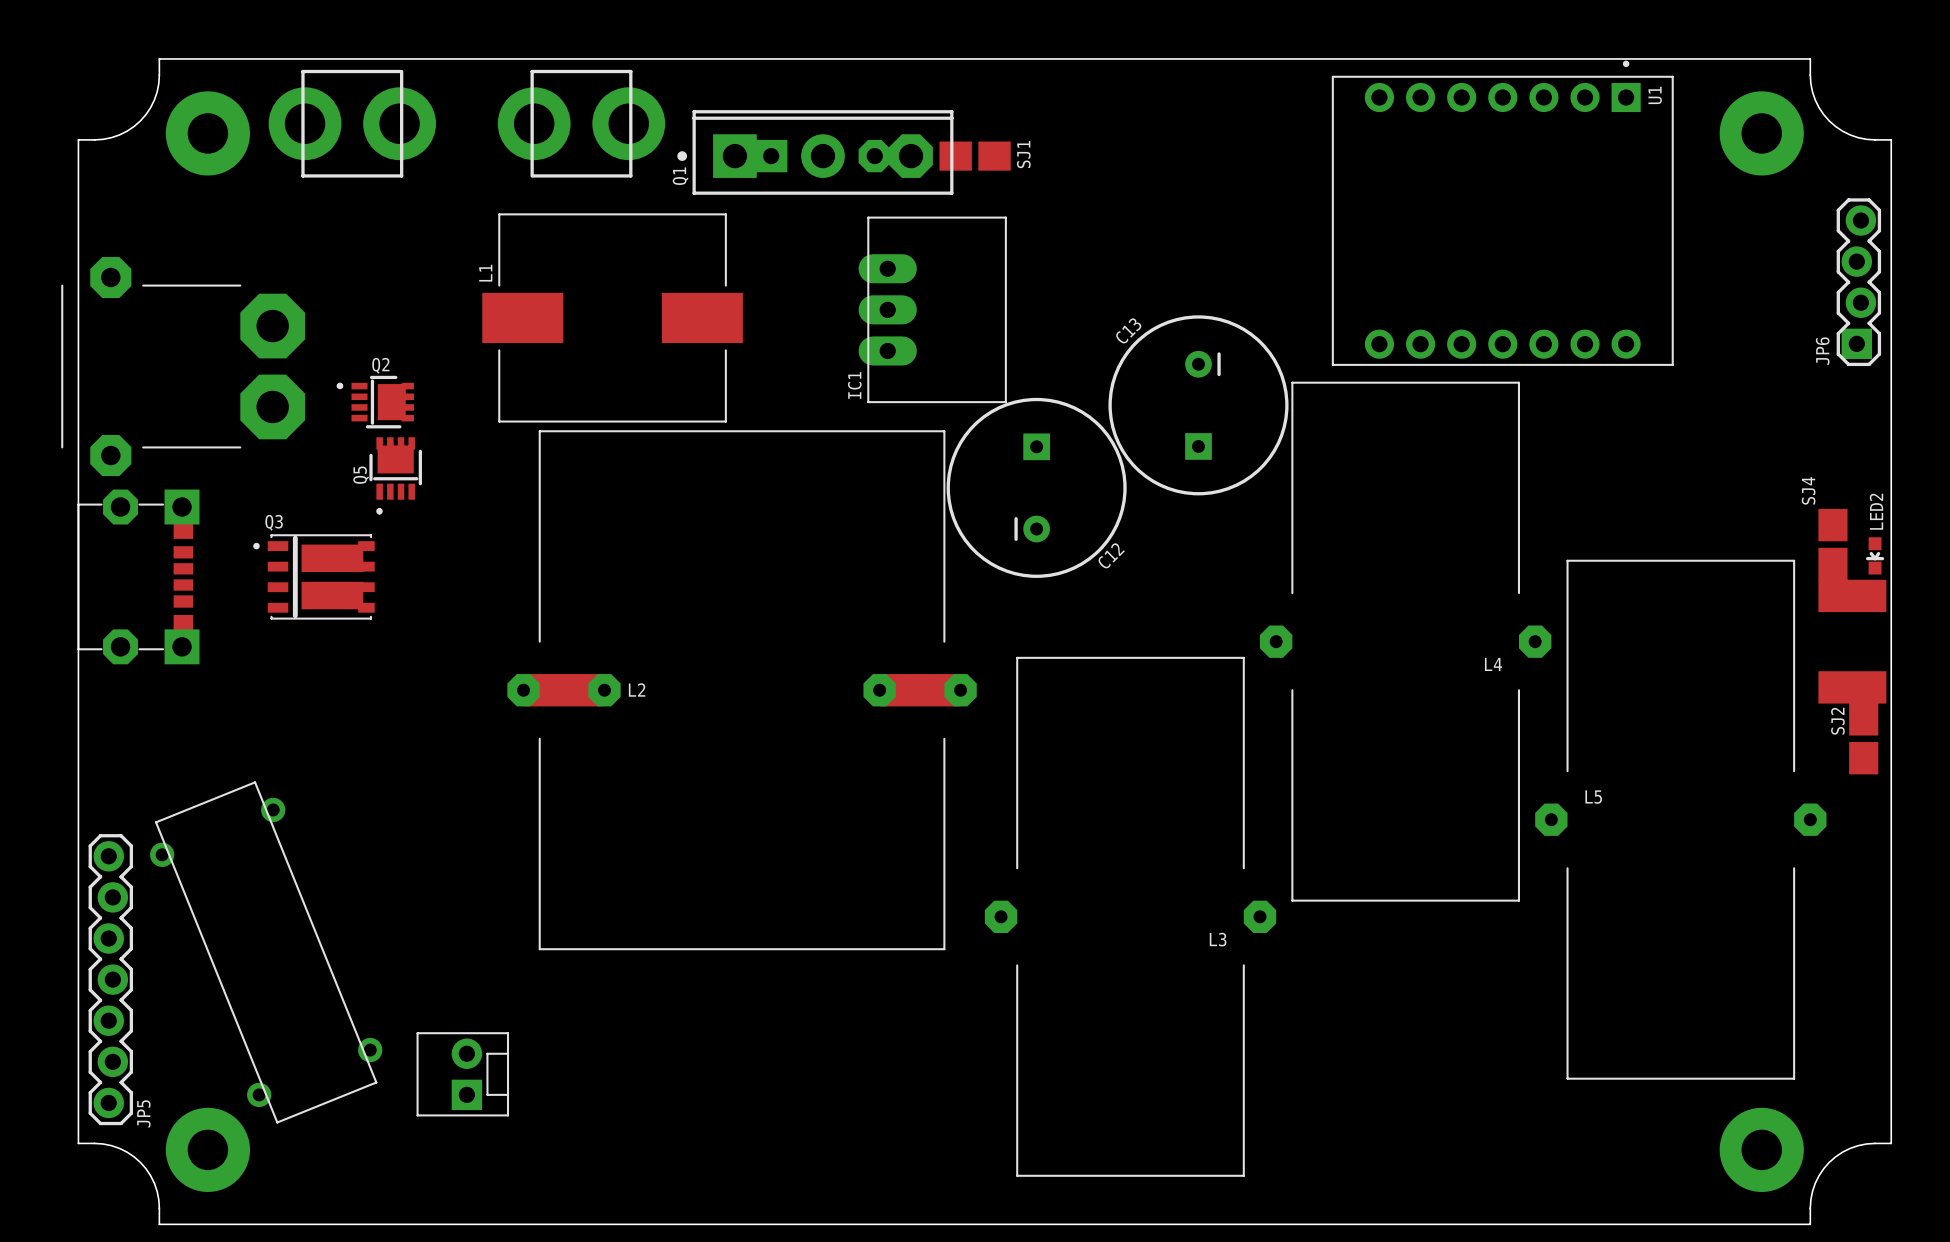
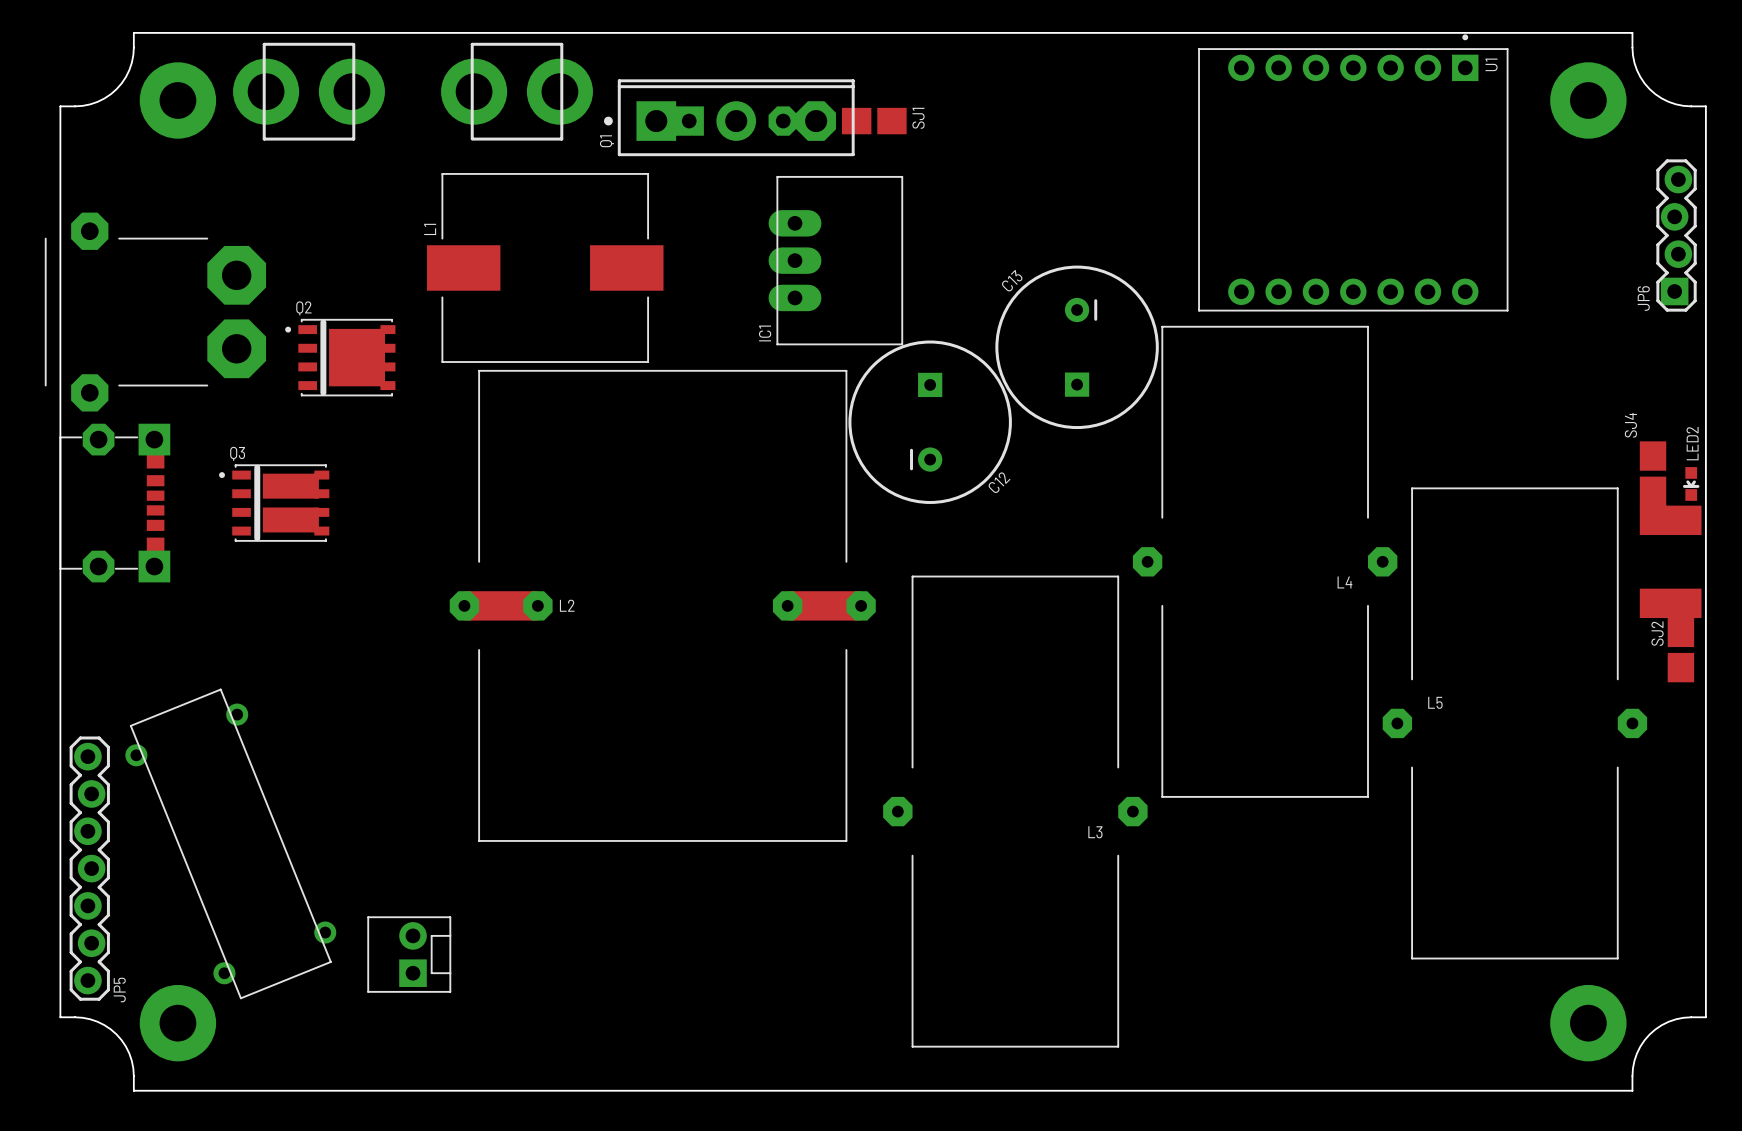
Q2 name position: Q2 (380, 365) -> Q2 (303, 308)
Q2 footprint: [336, 375, 414, 429] -> [285, 318, 396, 397]
line: none -> (323, 322) (323, 392)
Q5: (395, 475) -> none
Q3 footprint: [253, 534, 375, 620] -> [219, 464, 330, 542]
line: none -> (257, 467) (257, 538)

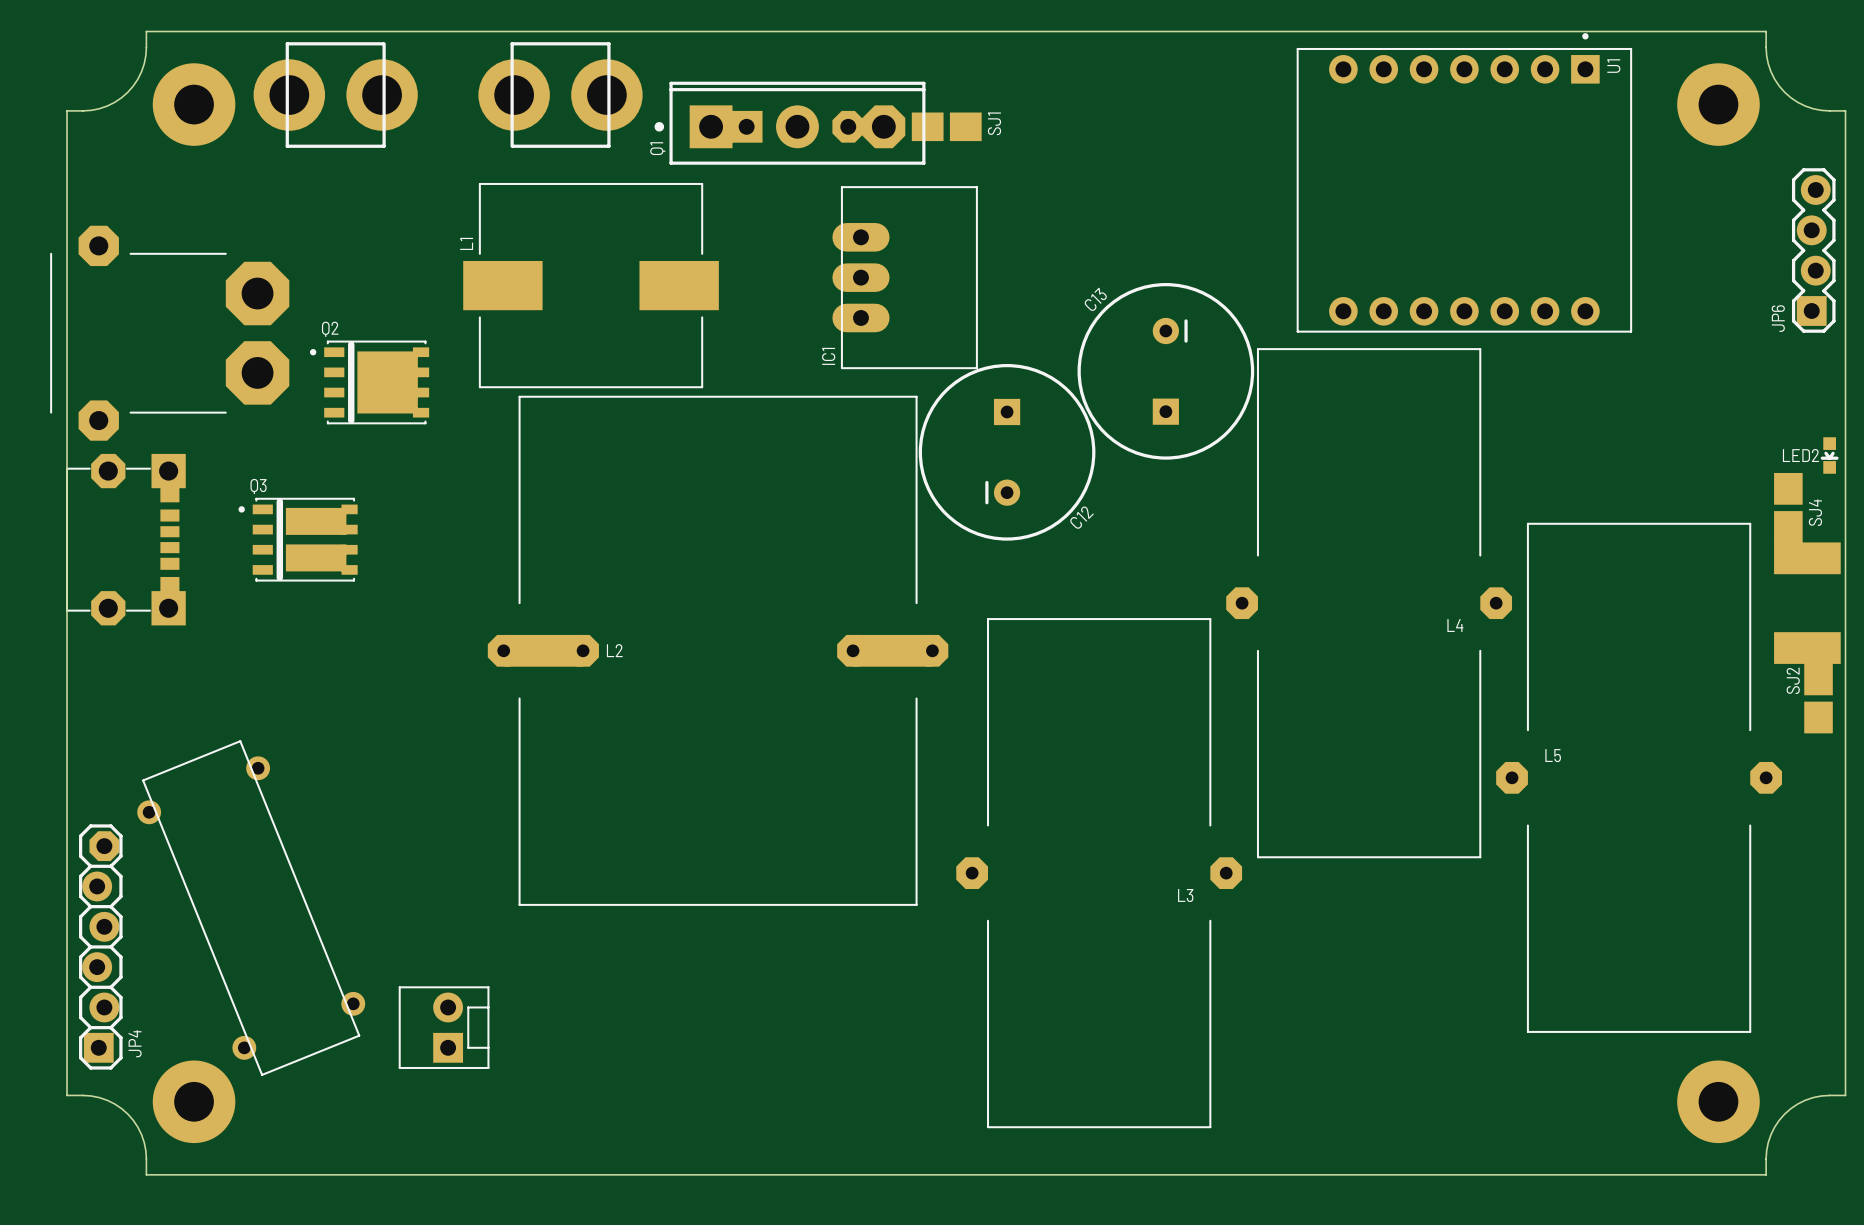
SJ4 name position: SJ4 (1630, 425) -> SJ4 (1815, 512)
LED2 name rotation: 0° (1692, 443) -> 90° clockwise (1800, 455)
LED2 position: (1691, 483) -> (1829, 455)
JP5: (89, 868) -> none
JP4: none -> (100, 946)

